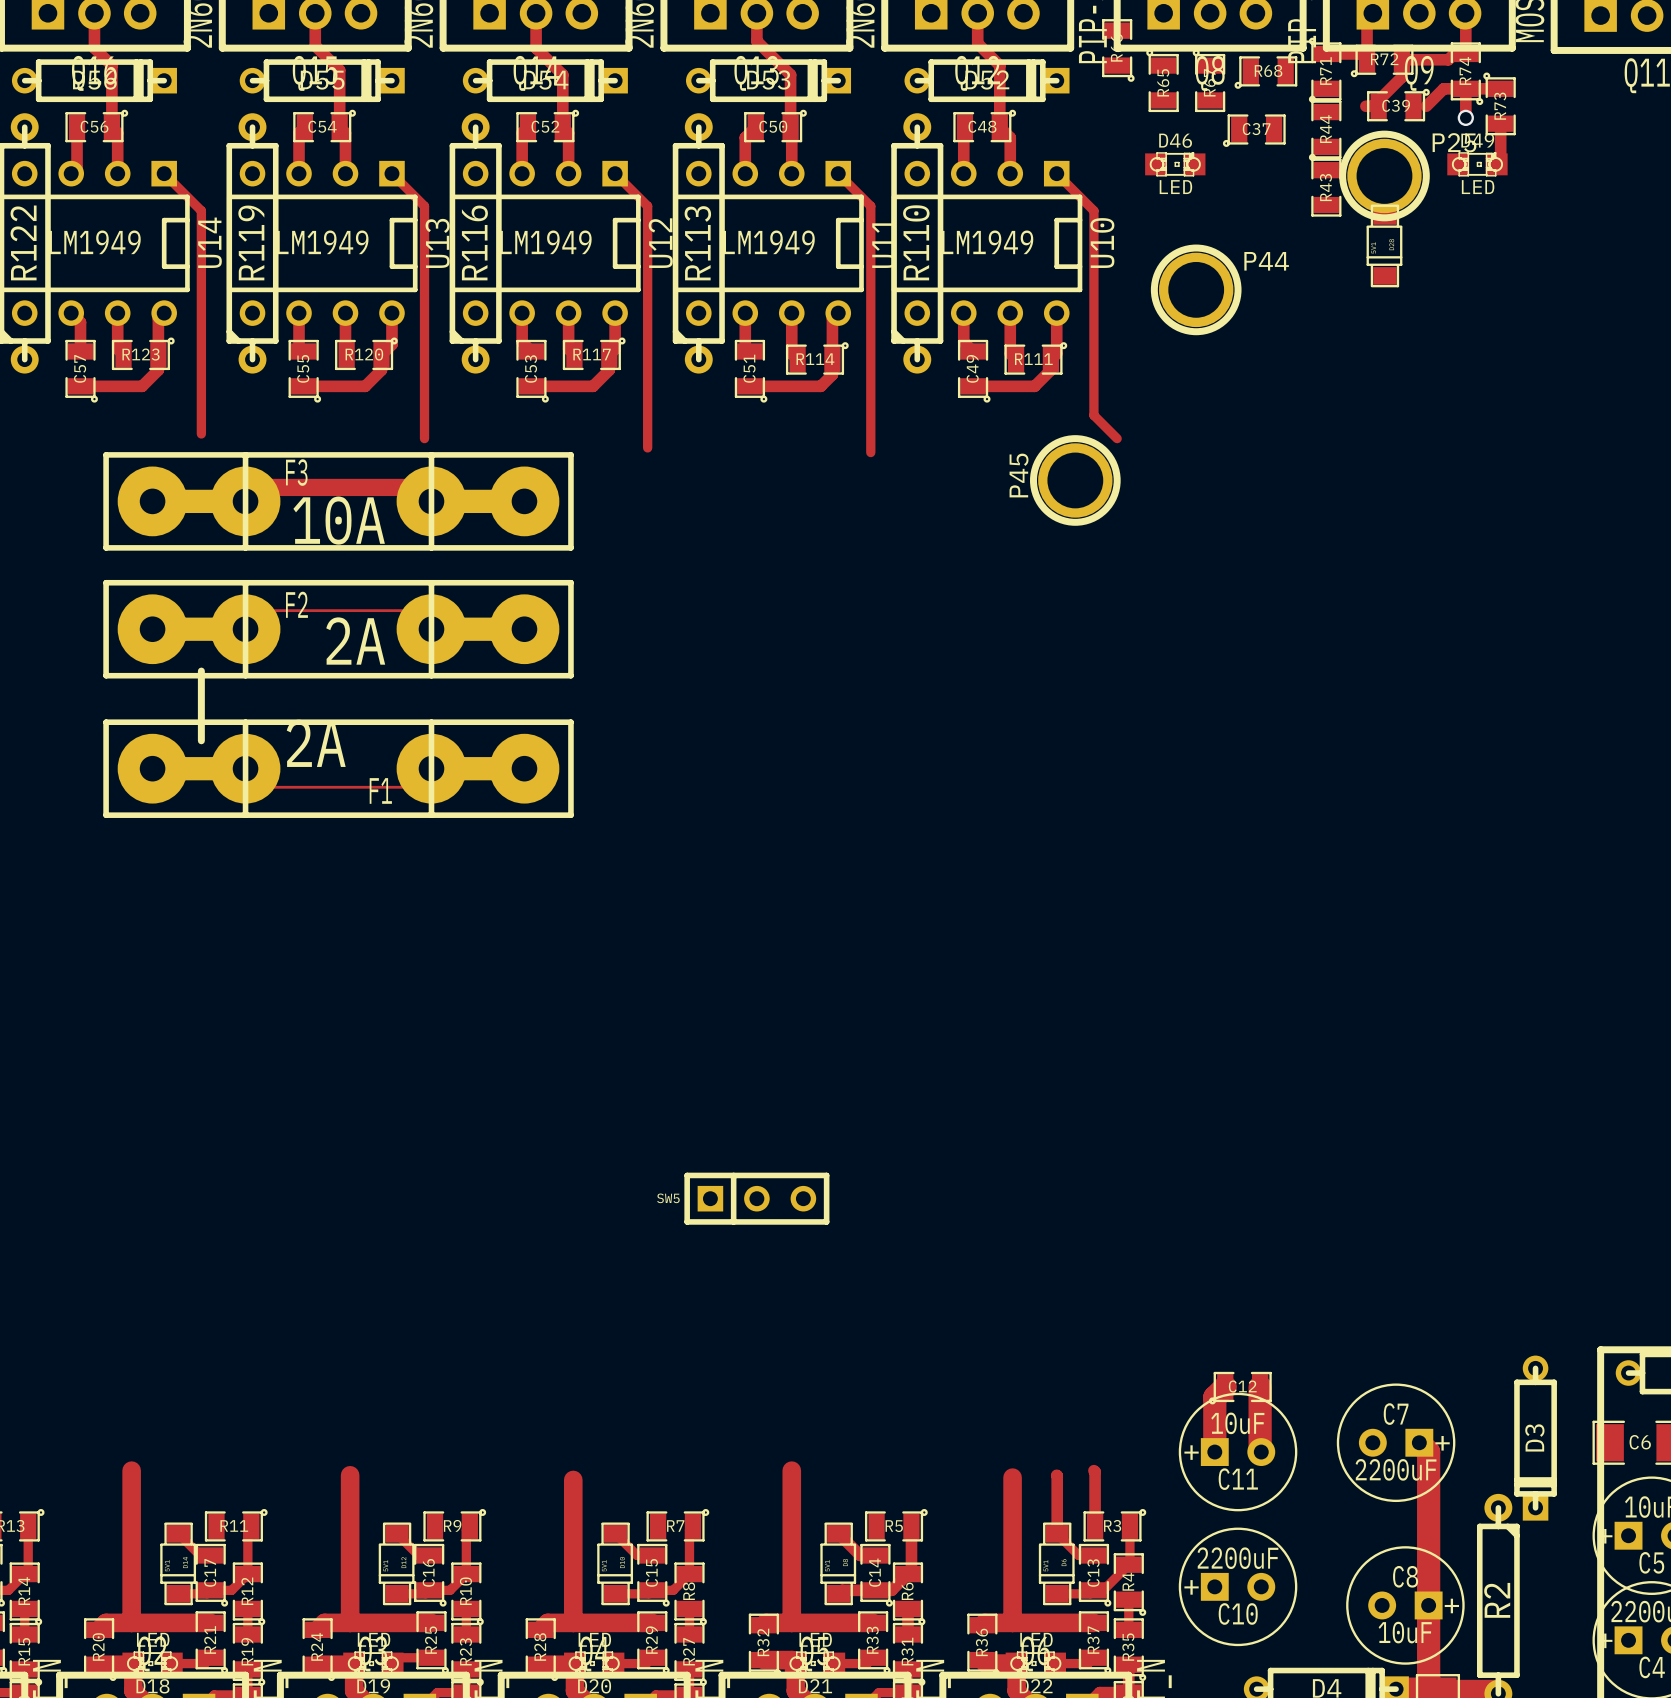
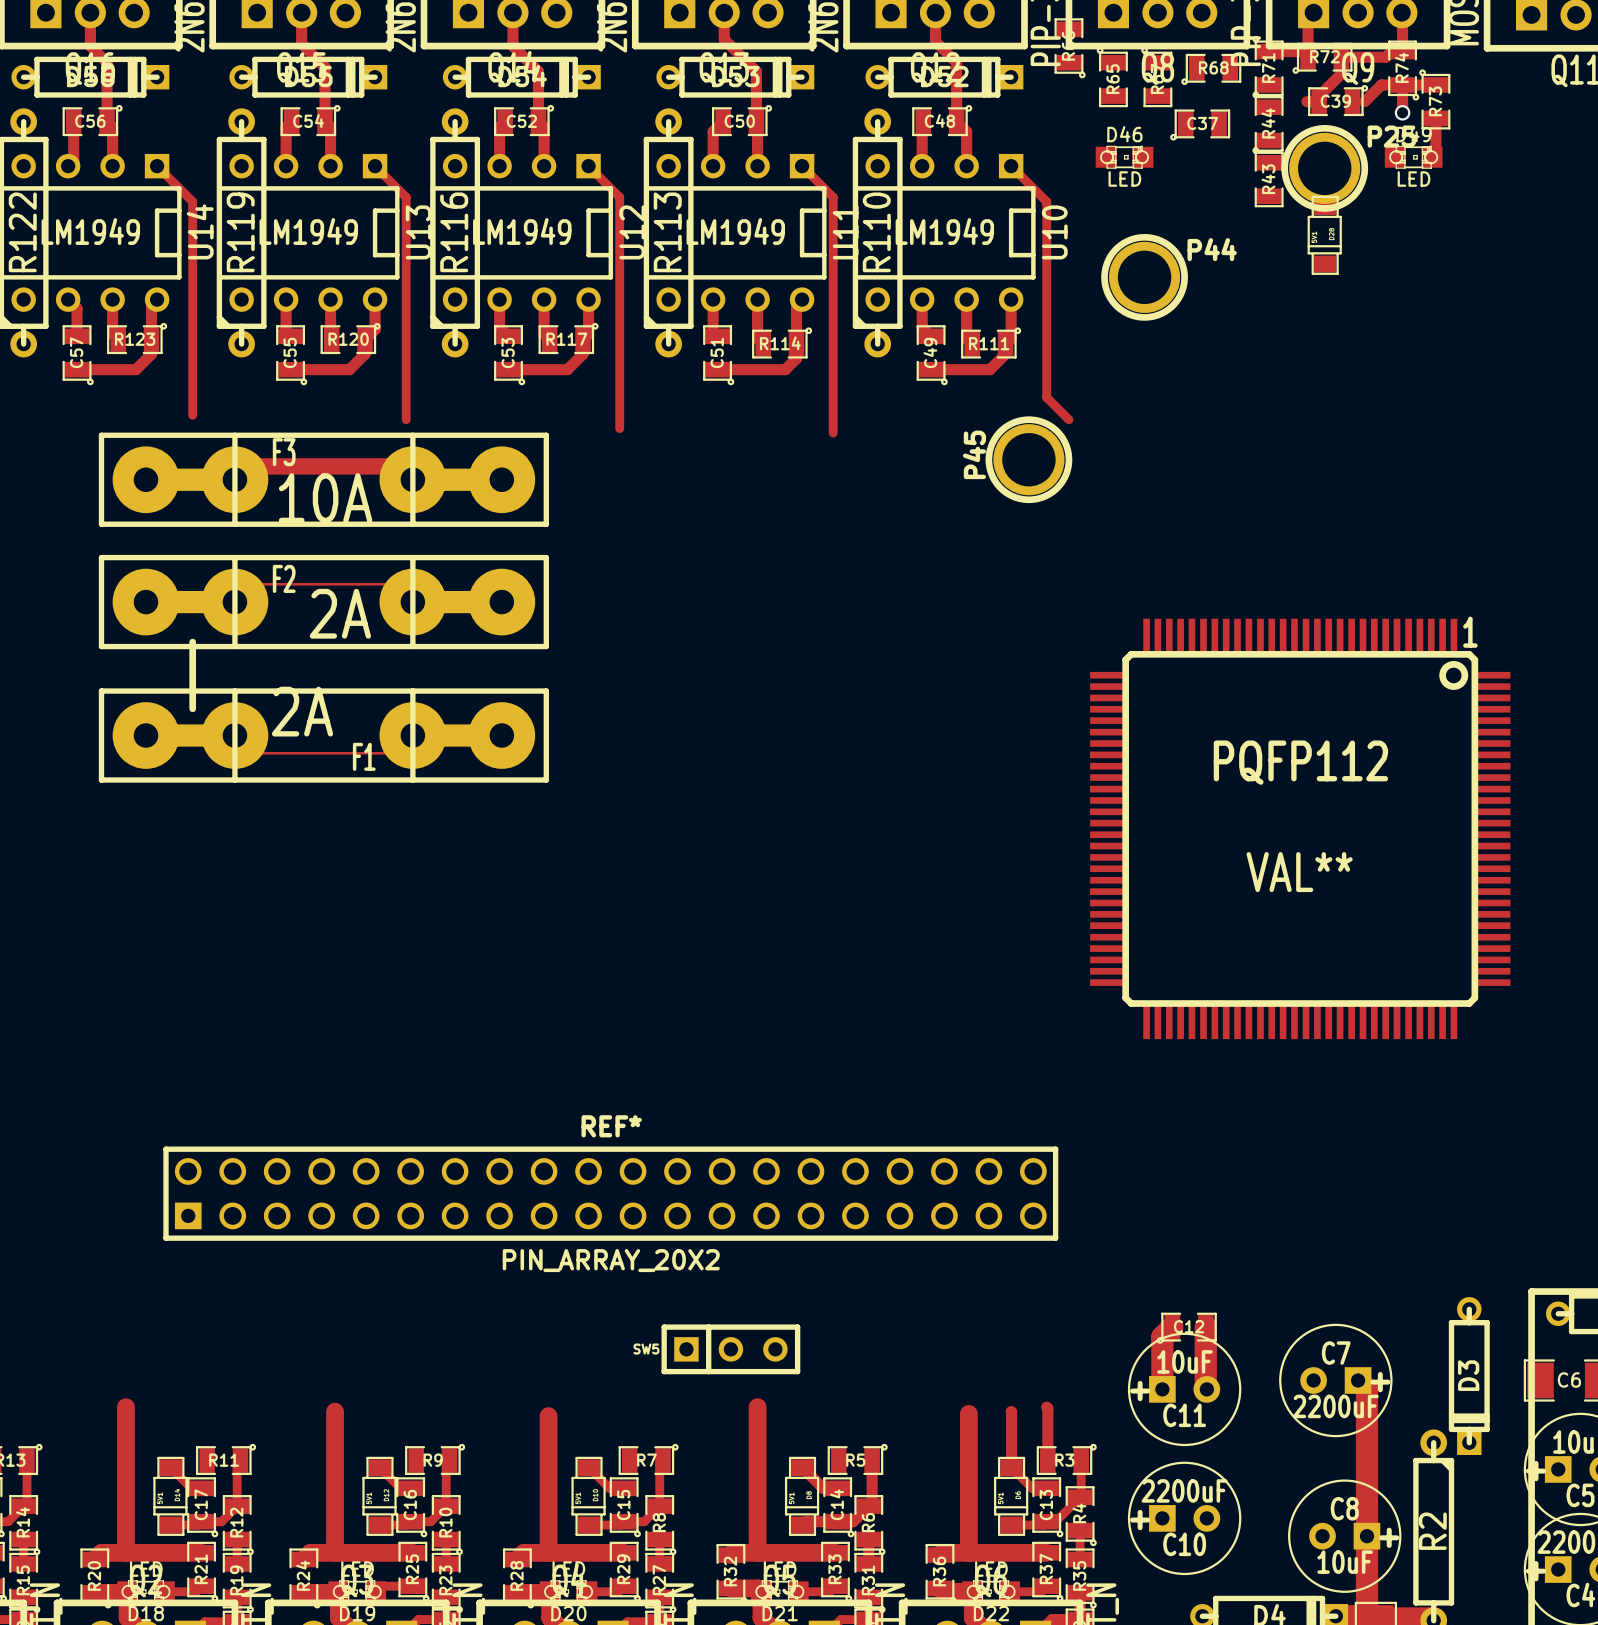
PQFP112: none -> VAL** (1300, 828)
SW5 position: (756, 1198) -> (730, 1349)
REF*: none -> PIN_ARRAY_20X2 (610, 1193)

